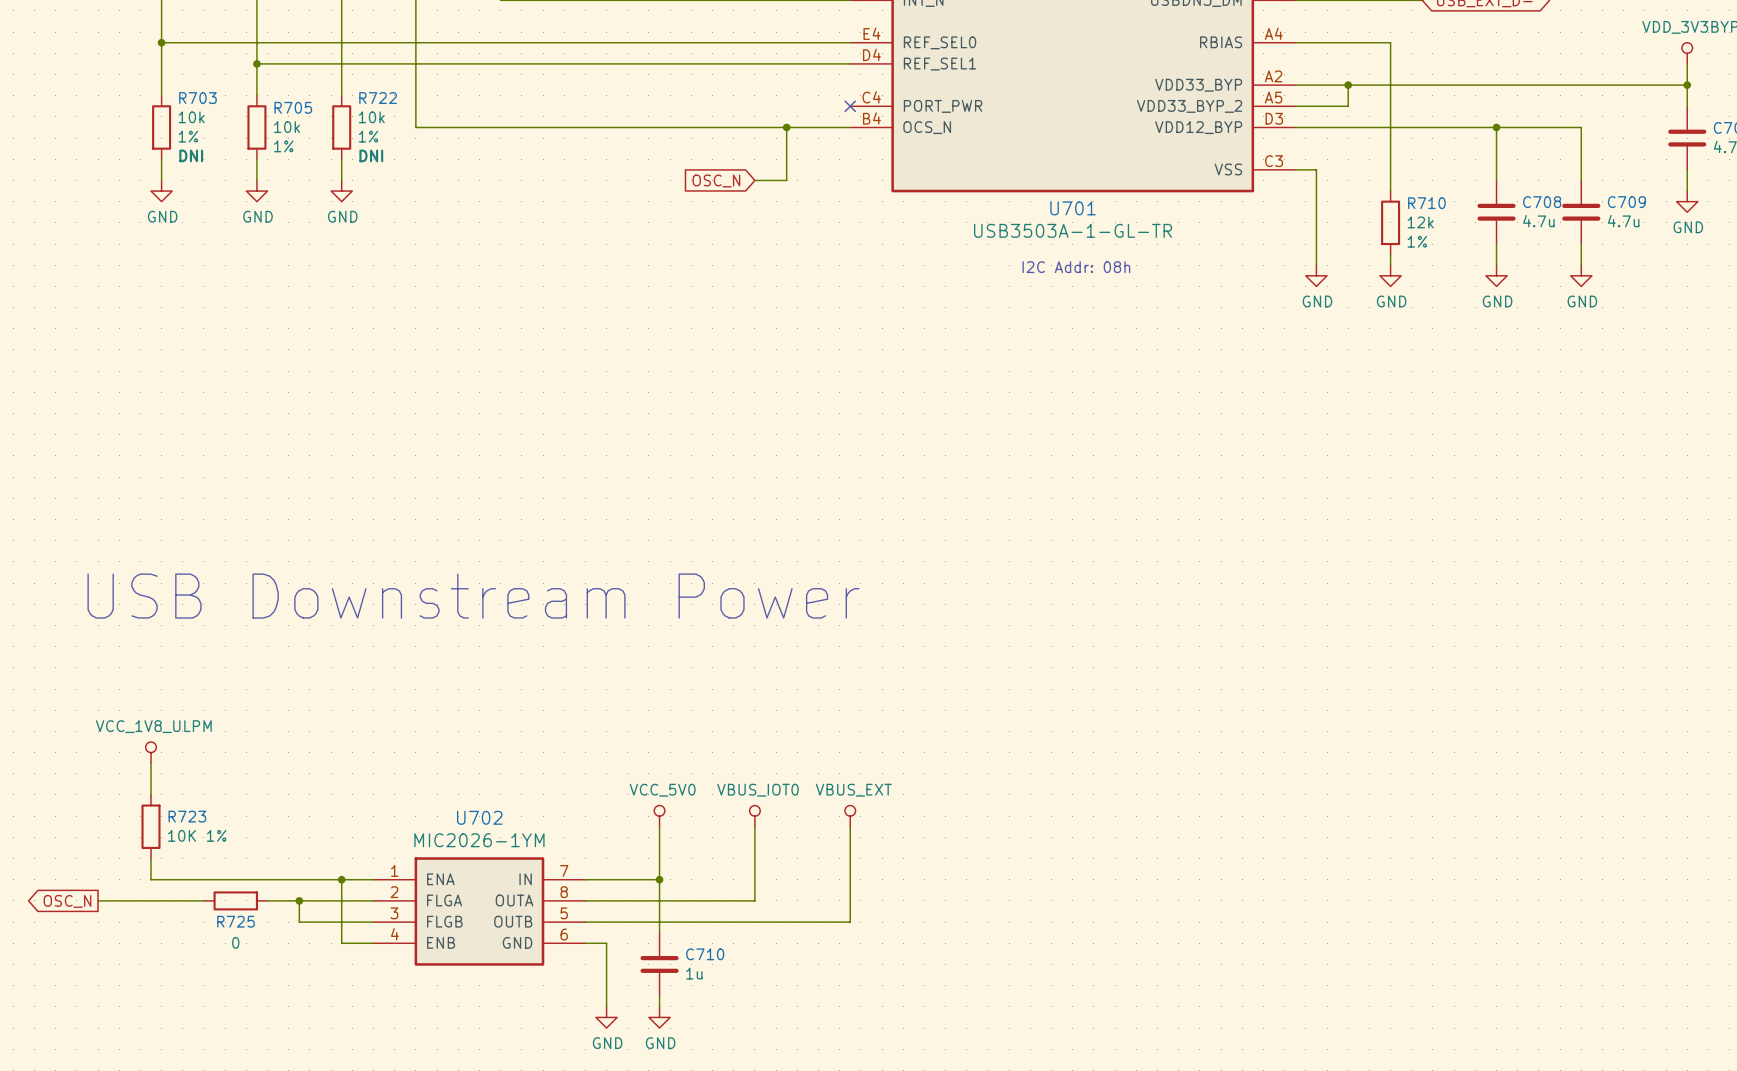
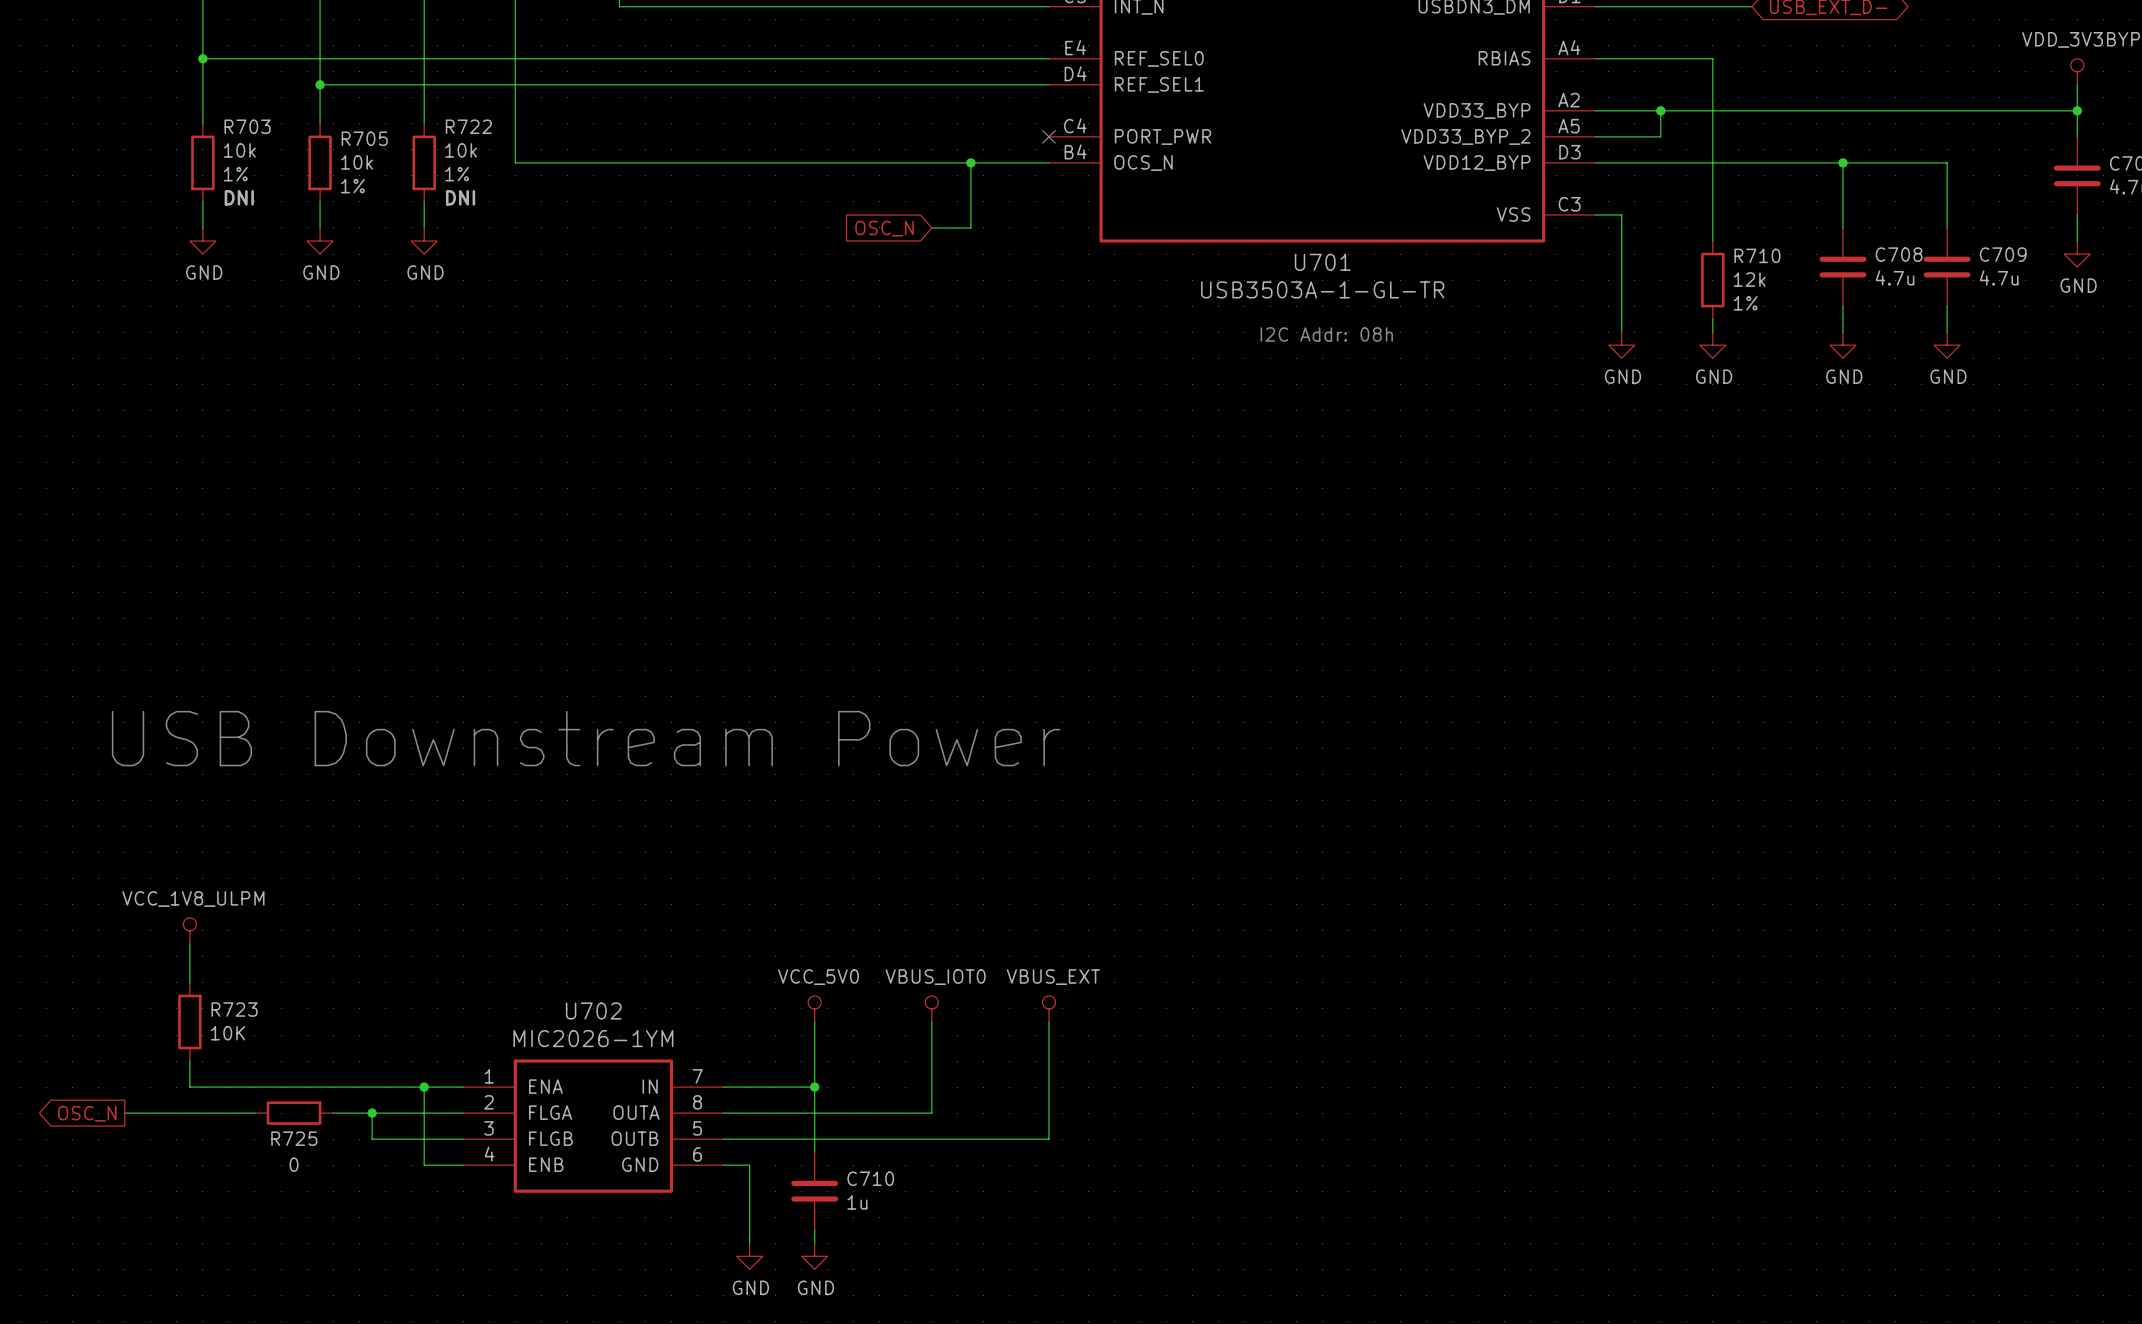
R723 value: 10K 1% (197, 835) -> 10K (228, 1033)

